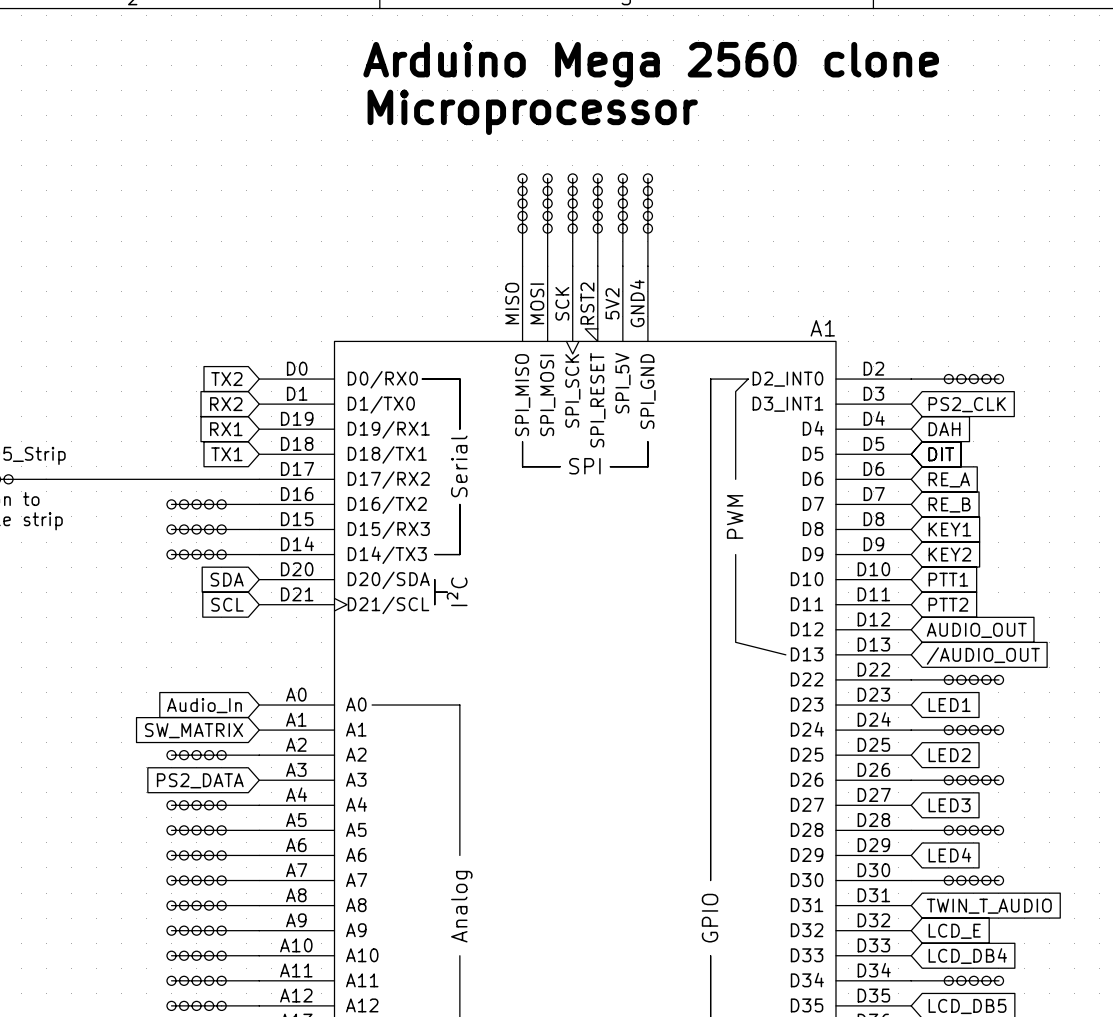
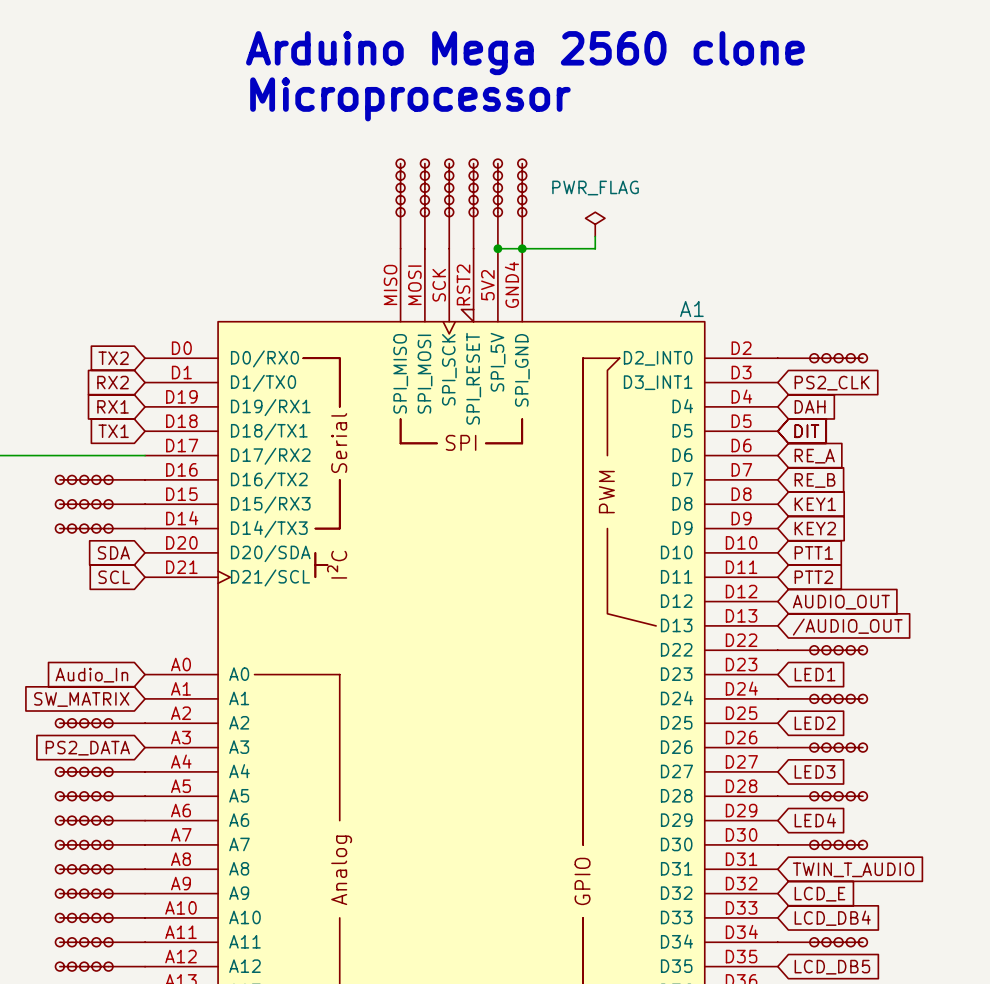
power symbol: none -> PWR_FLAG (595, 224)
wire: none -> (595, 236) (595, 248) (497, 248)
junction: none -> (497, 248)
junction: none -> (522, 248)

